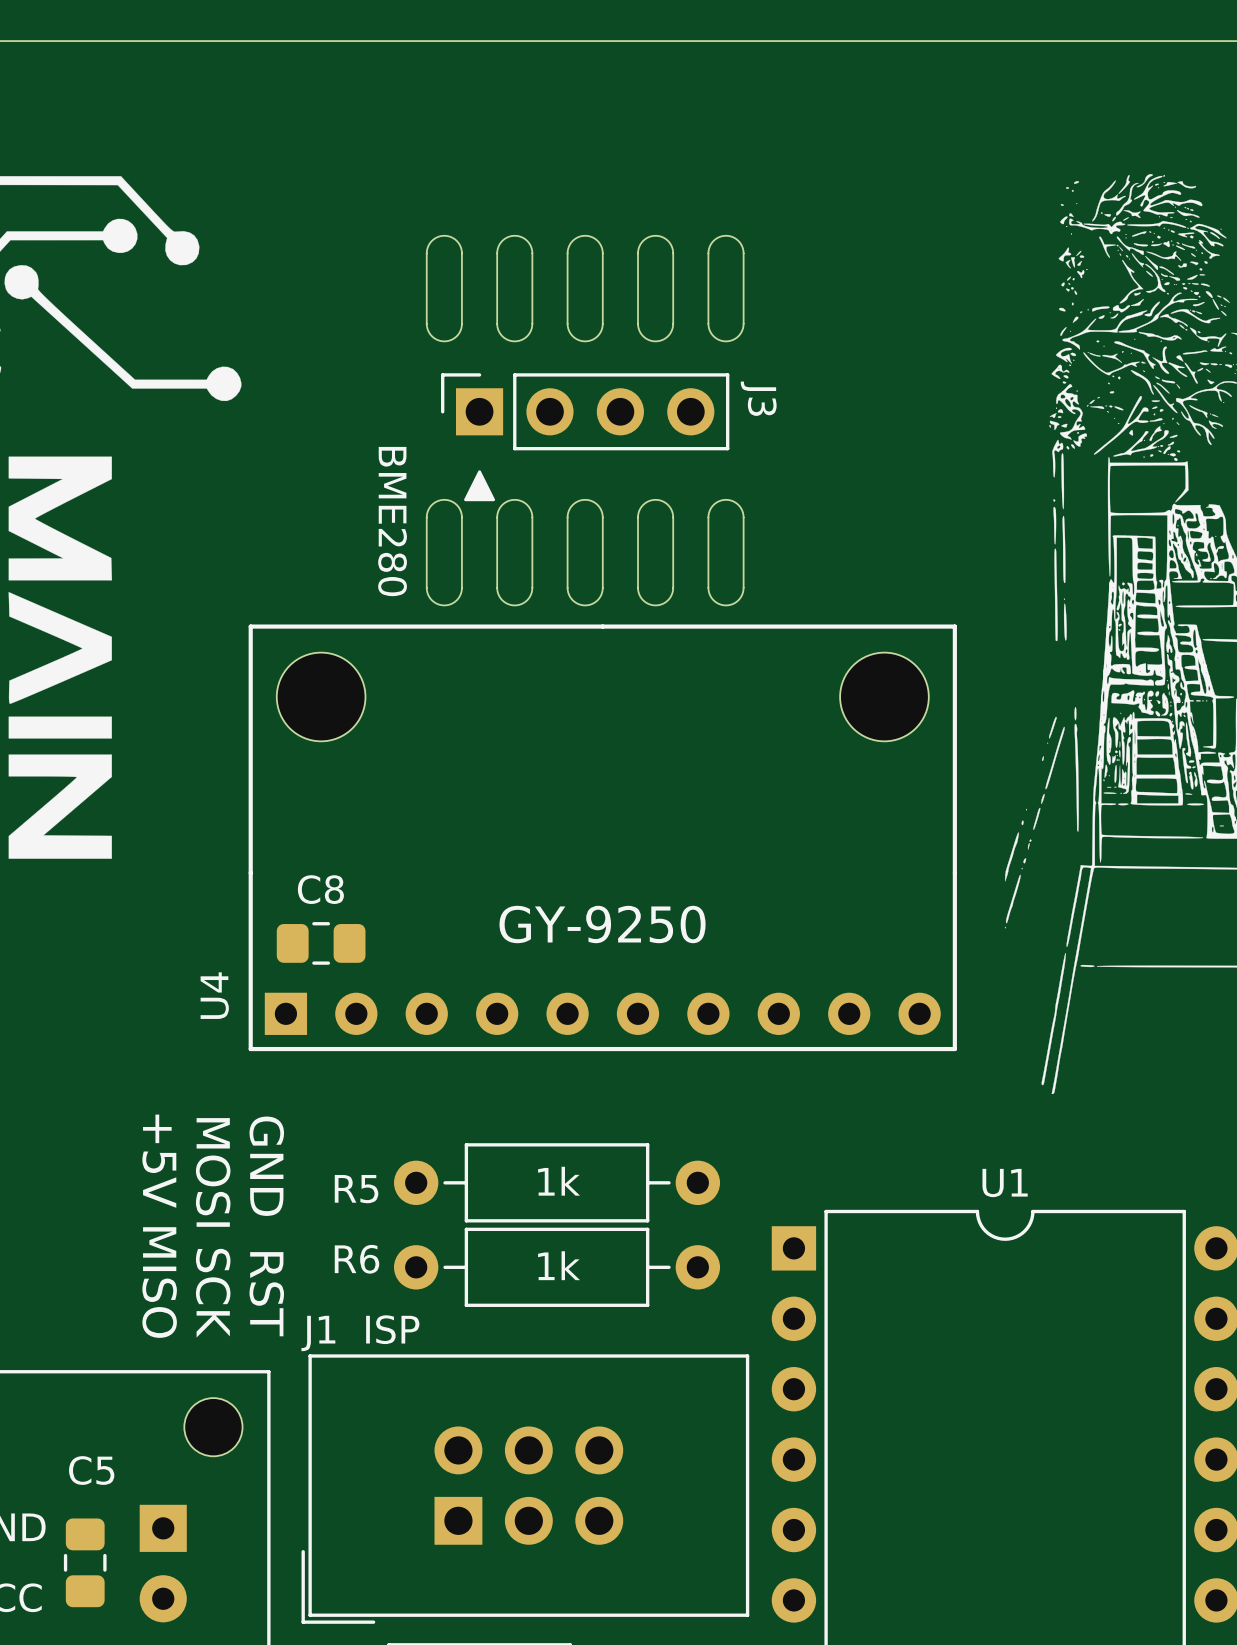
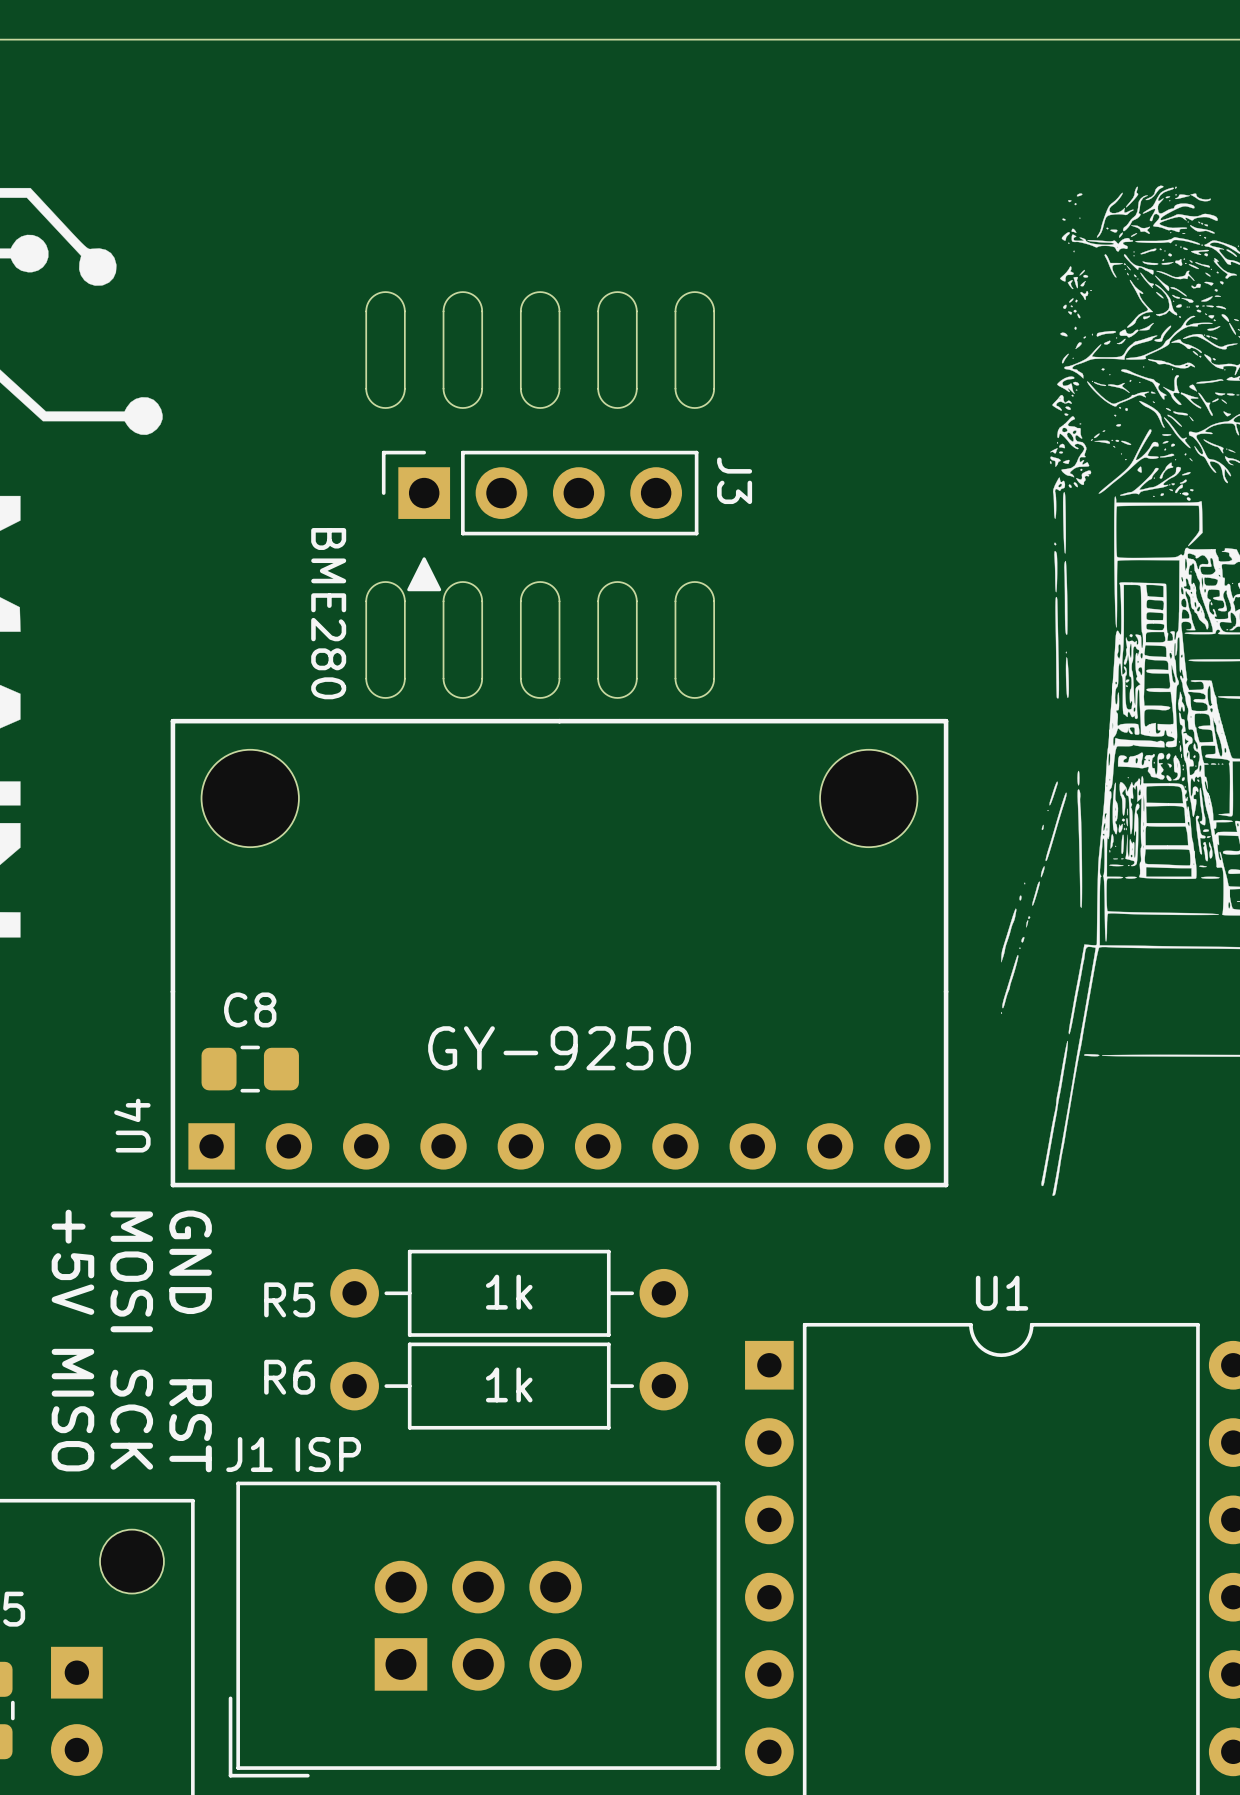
board edge: (497, 253) (500, 242) (508, 237) (517, 235) (527, 240) (532, 251) (532, 288) -> (443, 311) (449, 297) (462, 292) (476, 297) (482, 311)
board edge: (497, 253) (497, 288) -> (482, 350) (482, 388)
board edge: (567, 253) (569, 244) (578, 237) (587, 235) (597, 240) (602, 251) (602, 288) -> (520, 311) (526, 297) (540, 292) (553, 297) (559, 311)
board edge: (567, 253) (567, 288) -> (559, 350) (559, 388)
board edge: (637, 253) (641, 242) (648, 237) (657, 235) (668, 240) (673, 251) (673, 288) -> (598, 311) (603, 297) (617, 292) (631, 297) (636, 311)
board edge: (637, 253) (637, 288) -> (636, 350) (636, 388)
board edge: (708, 253) (710, 244) (719, 237) (728, 235) (738, 240) (743, 251) (743, 288) -> (675, 311) (681, 297) (694, 292) (708, 297) (714, 311)
board edge: (708, 253) (708, 288) -> none
board edge: (426, 288) (427, 248) (433, 239) (444, 235) (455, 239) (461, 248) (461, 288) -> (366, 311) (371, 297) (385, 292) (399, 297) (404, 311)
board edge: (426, 323) (431, 336) (444, 341) (456, 336) (461, 323) -> (366, 350) (366, 393) (373, 404) (385, 408) (397, 404) (404, 393) (404, 350)
board edge: (497, 323) (502, 336) (514, 341) (527, 336) (532, 323) -> (443, 350) (443, 391) (449, 402) (460, 407) (470, 406) (479, 398) (482, 388)
board edge: (567, 323) (572, 336) (585, 341) (597, 336) (602, 323) -> (520, 350) (521, 391) (526, 402) (537, 407) (547, 406) (555, 400) (559, 388)
board edge: (637, 323) (643, 336) (655, 341) (668, 336) (673, 323) -> (598, 350) (598, 391) (603, 402) (614, 407) (624, 406) (634, 398) (636, 388)
board edge: (708, 323) (713, 336) (726, 341) (738, 336) (743, 323) -> (675, 350) (676, 393) (683, 404) (694, 408) (706, 404) (713, 393) (714, 350)
J3 position: (585, 411) -> (540, 493)
drawing position: (479, 485) -> (424, 574)
board edge: (497, 517) (500, 506) (508, 501) (519, 500) (527, 504) (532, 515) (532, 552) -> (443, 601) (449, 587) (462, 581) (476, 587) (482, 601)
board edge: (497, 517) (497, 552) -> (482, 639) (482, 678)
board edge: (567, 517) (569, 508) (578, 501) (589, 500) (597, 504) (602, 515) (602, 552) -> (520, 601) (526, 587) (540, 581) (553, 587) (559, 601)
board edge: (567, 517) (567, 552) -> (559, 639) (559, 678)
board edge: (637, 517) (641, 506) (648, 501) (660, 500) (668, 504) (673, 515) (673, 552) -> (598, 601) (603, 587) (617, 581) (631, 587) (636, 601)
board edge: (637, 517) (637, 552) -> (636, 639) (636, 678)
board edge: (708, 517) (710, 508) (719, 501) (730, 500) (738, 504) (743, 515) (743, 552) -> (675, 601) (681, 587) (694, 581) (708, 587) (714, 601)
board edge: (708, 517) (708, 552) -> none
board edge: (426, 552) (427, 512) (433, 503) (444, 499) (455, 503) (461, 512) (461, 552) -> (366, 601) (371, 587) (385, 581) (399, 587) (404, 601)
board edge: (426, 587) (431, 600) (444, 605) (456, 600) (461, 587) -> (366, 639) (366, 683) (373, 693) (385, 697) (397, 693) (404, 683) (404, 639)
board edge: (497, 587) (502, 600) (514, 605) (527, 600) (532, 587) -> (443, 639) (443, 681) (449, 692) (457, 697) (470, 696) (479, 688) (482, 678)
board edge: (567, 587) (572, 600) (585, 605) (597, 600) (602, 587) -> (520, 639) (521, 681) (526, 692) (535, 697) (547, 696) (555, 690) (559, 678)
board edge: (637, 587) (643, 600) (655, 605) (668, 600) (673, 587) -> (598, 639) (598, 681) (603, 692) (612, 697) (624, 696) (634, 688) (636, 678)
board edge: (708, 587) (713, 600) (726, 605) (738, 600) (743, 587) -> (675, 639) (676, 683) (683, 693) (694, 697) (706, 693) (713, 683) (714, 639)
U4 position: (602, 837) -> (559, 953)
C8 position: (321, 943) -> (250, 1069)

